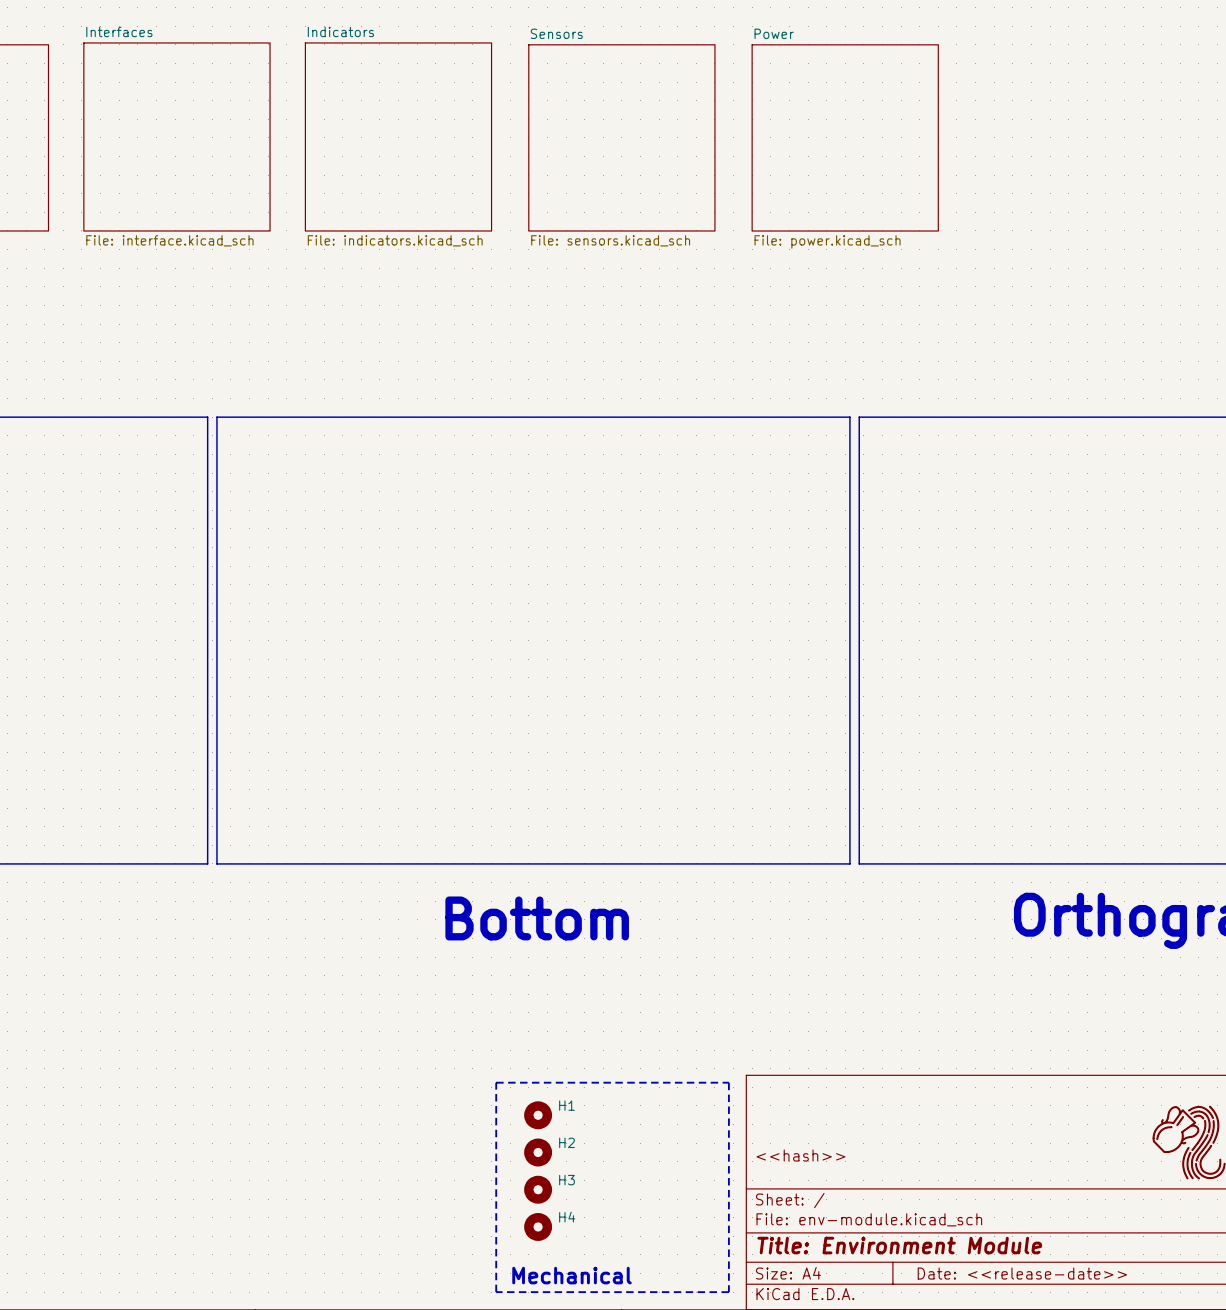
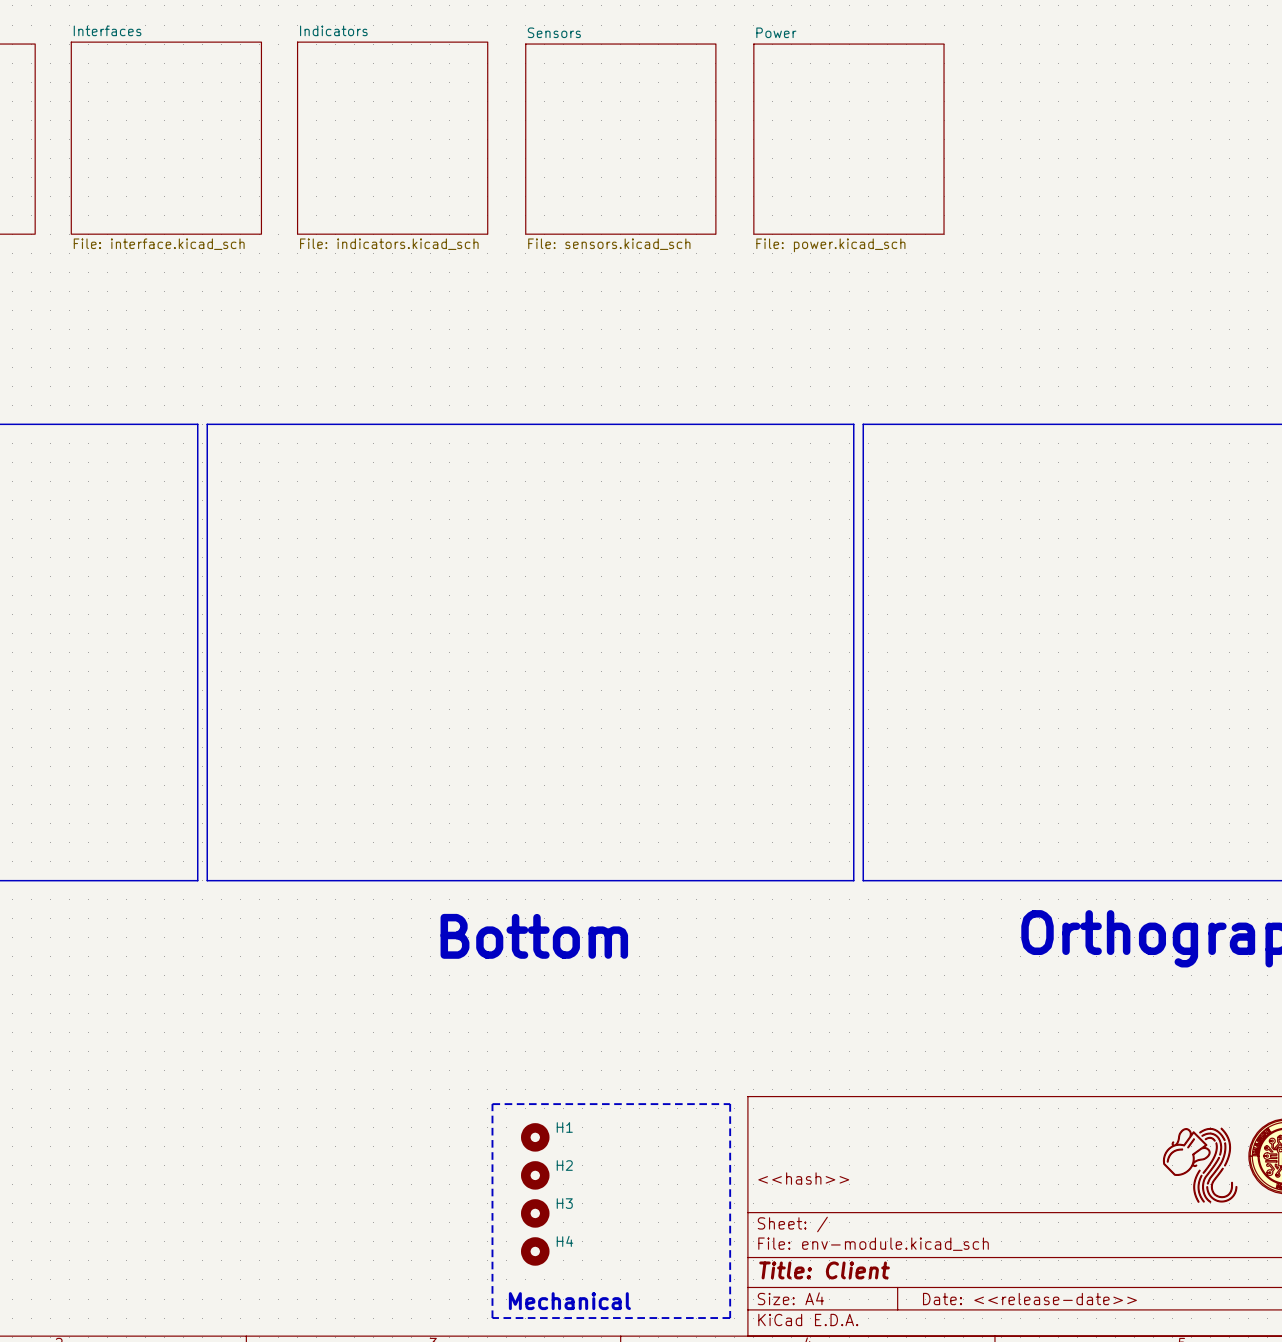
title block: Title: Environment Module (899, 1245) -> Title: Client (824, 1270)

